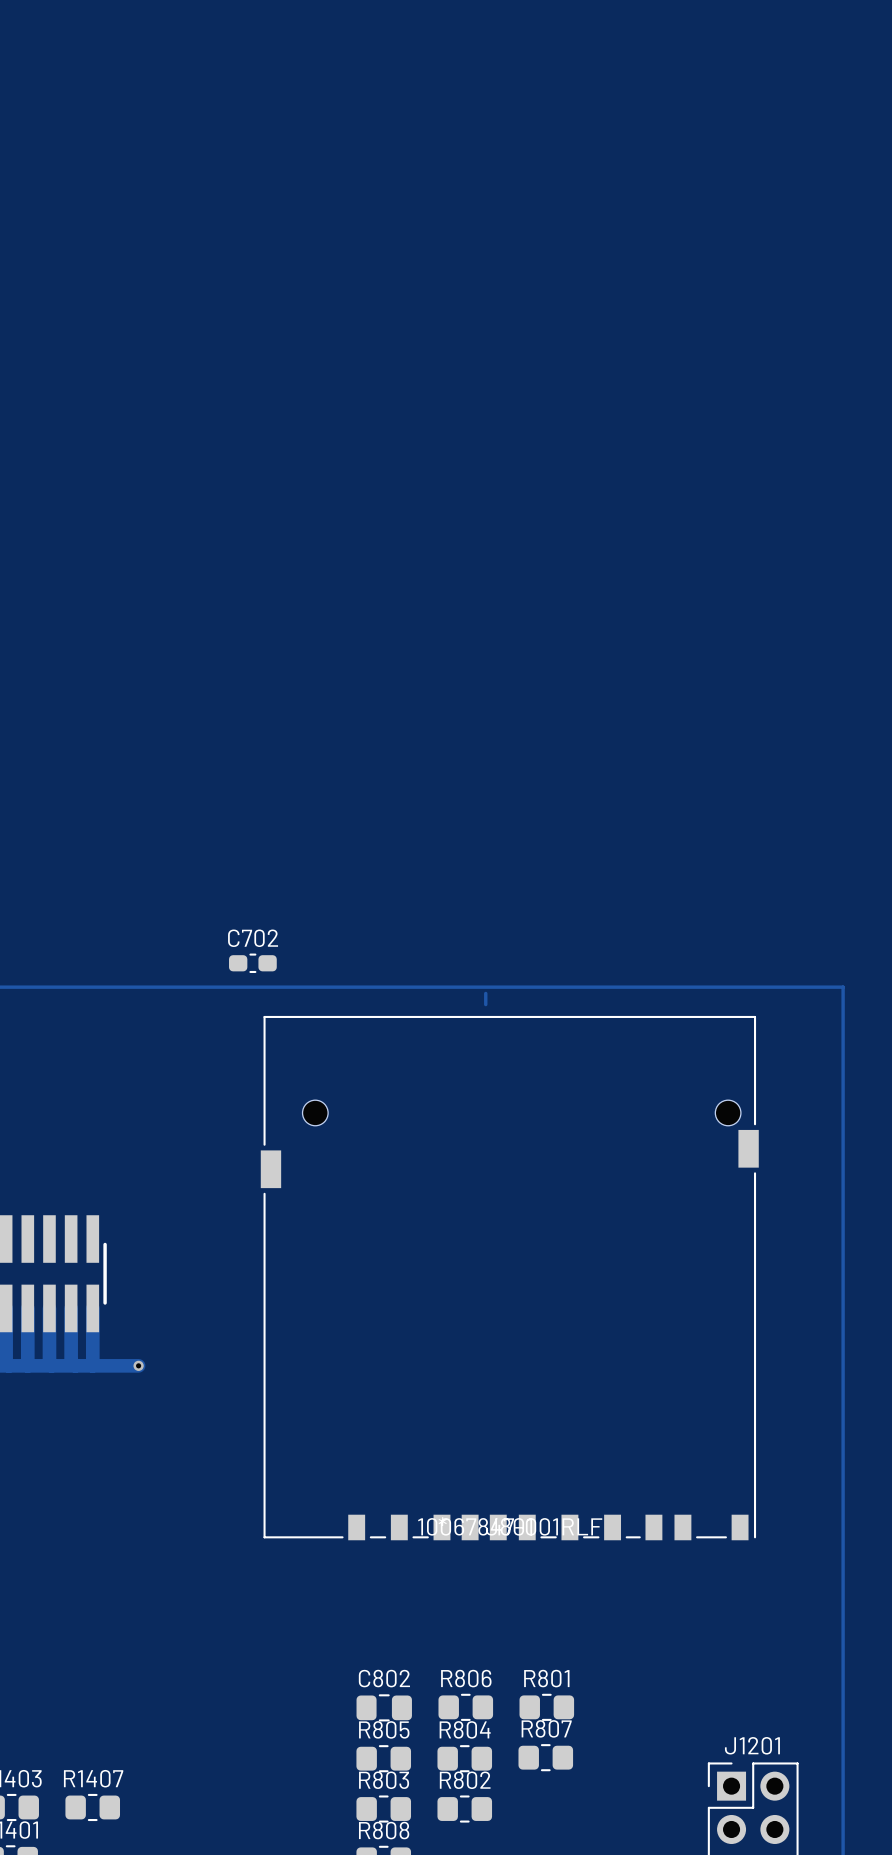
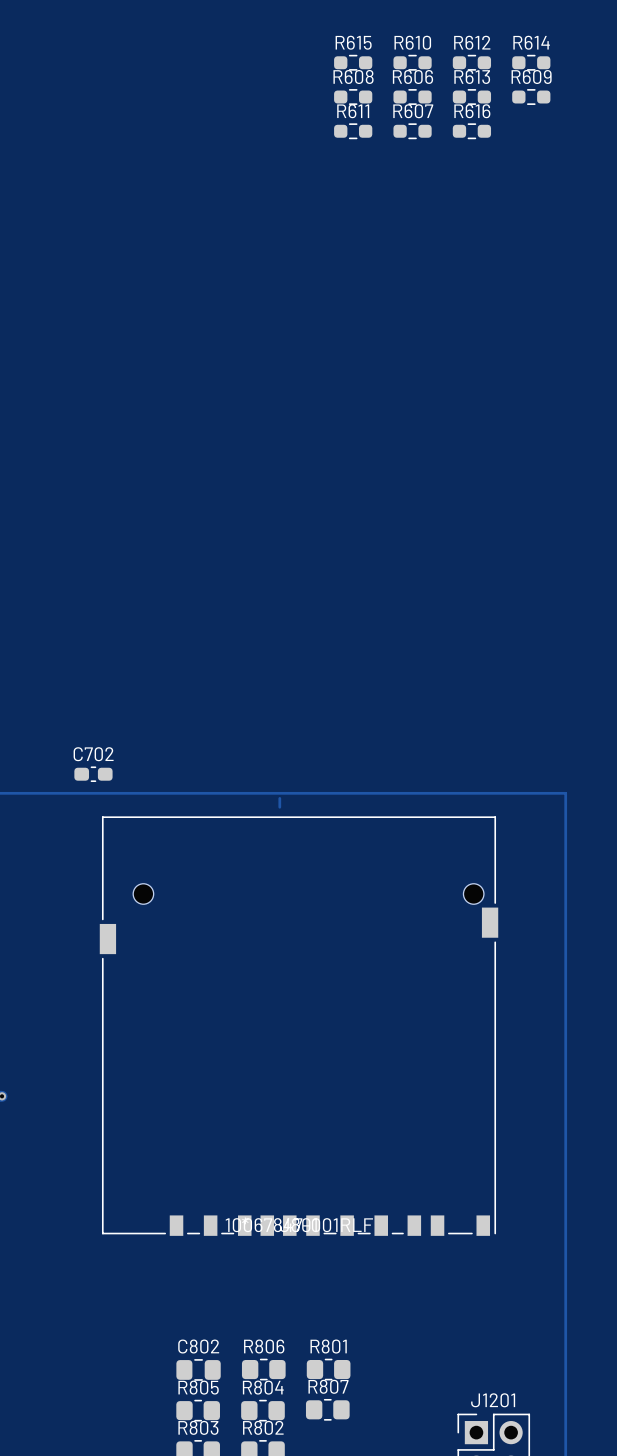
R615: none -> (353, 62)
R610: none -> (412, 62)
R612: none -> (471, 62)
R614: none -> (531, 62)
R608: none -> (353, 97)
R606: none -> (412, 97)
R613: none -> (471, 97)
R609: none -> (531, 97)
R611: none -> (353, 131)
R607: none -> (412, 131)
R616: none -> (471, 131)

